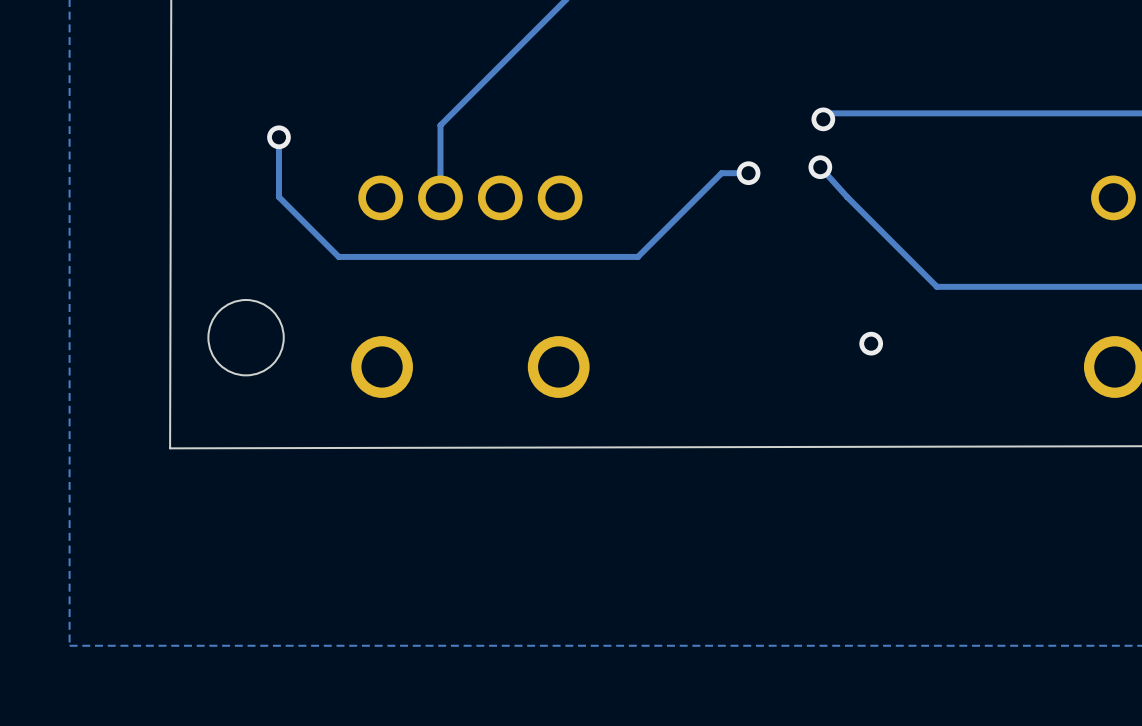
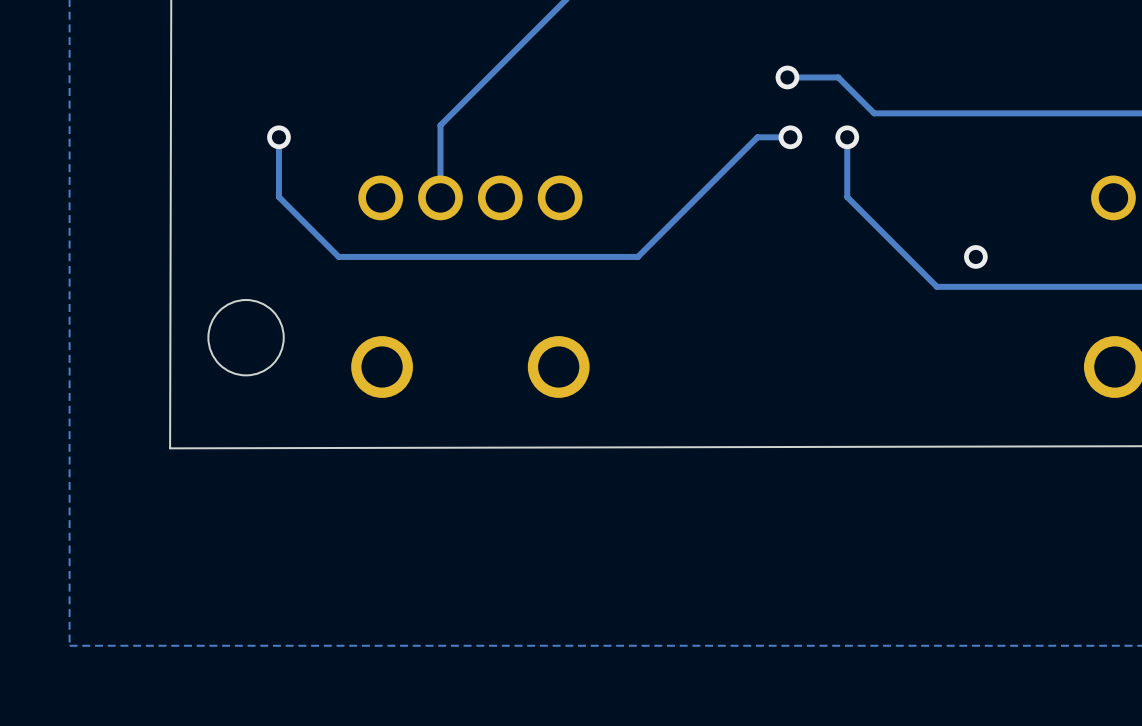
via: none -> (787, 77)
track: (874, 113) (829, 113) (823, 119) -> (874, 113) (838, 77) (787, 77)
via: (823, 119) -> none
via: none -> (790, 137)
via: none -> (847, 137)
track: (820, 167) (847, 197) -> (847, 137) (847, 197)
via: (820, 167) -> none
track: (748, 173) (721, 173) -> (790, 137) (757, 137) (721, 173)
via: (748, 173) -> none
via: none -> (975, 256)
via: (871, 343) -> none

